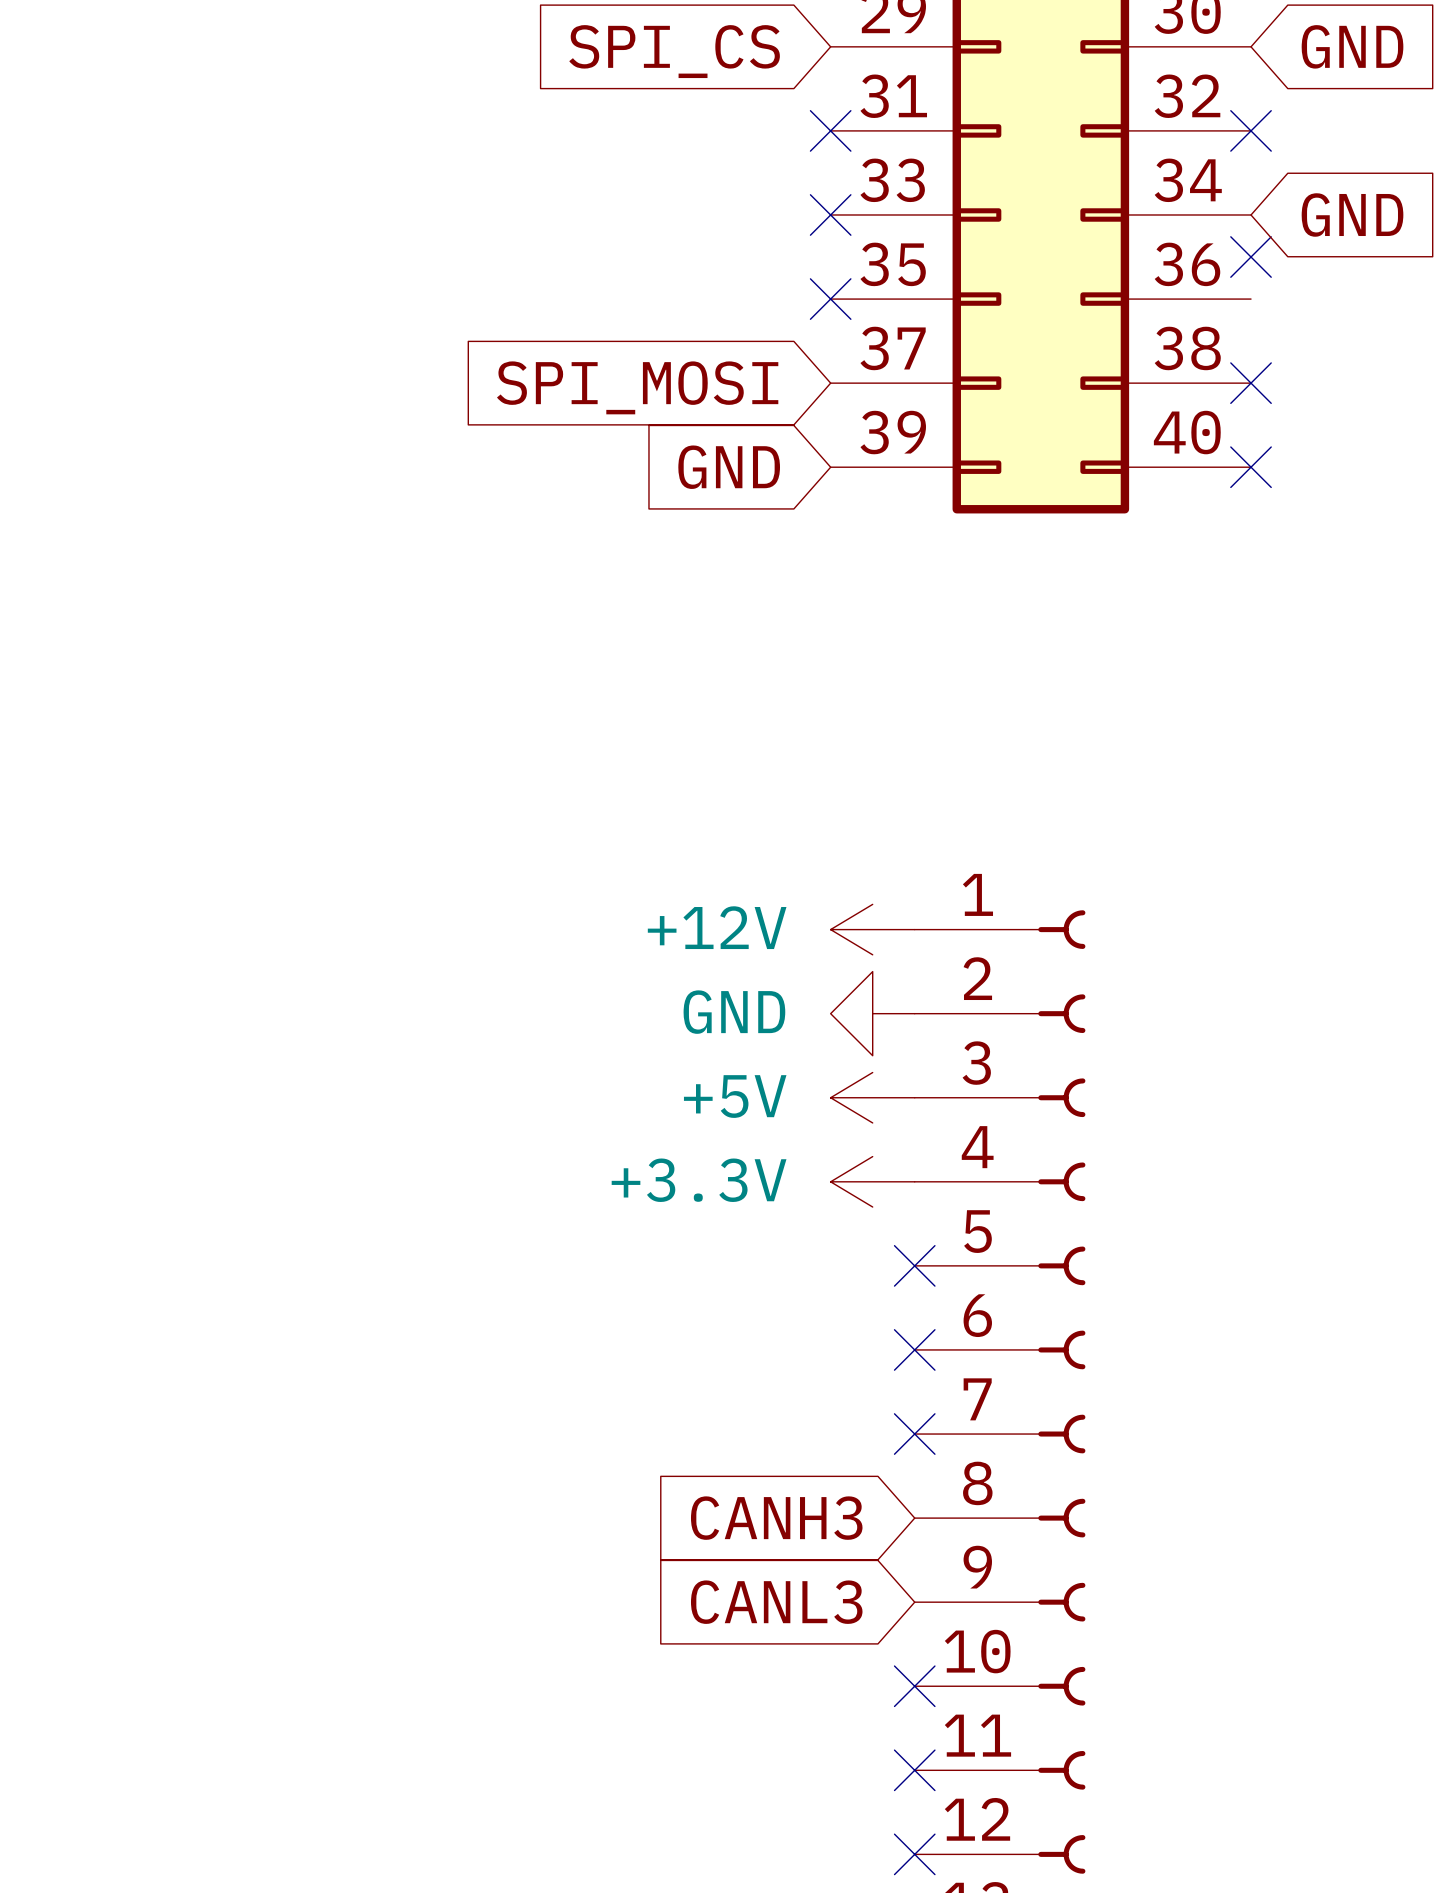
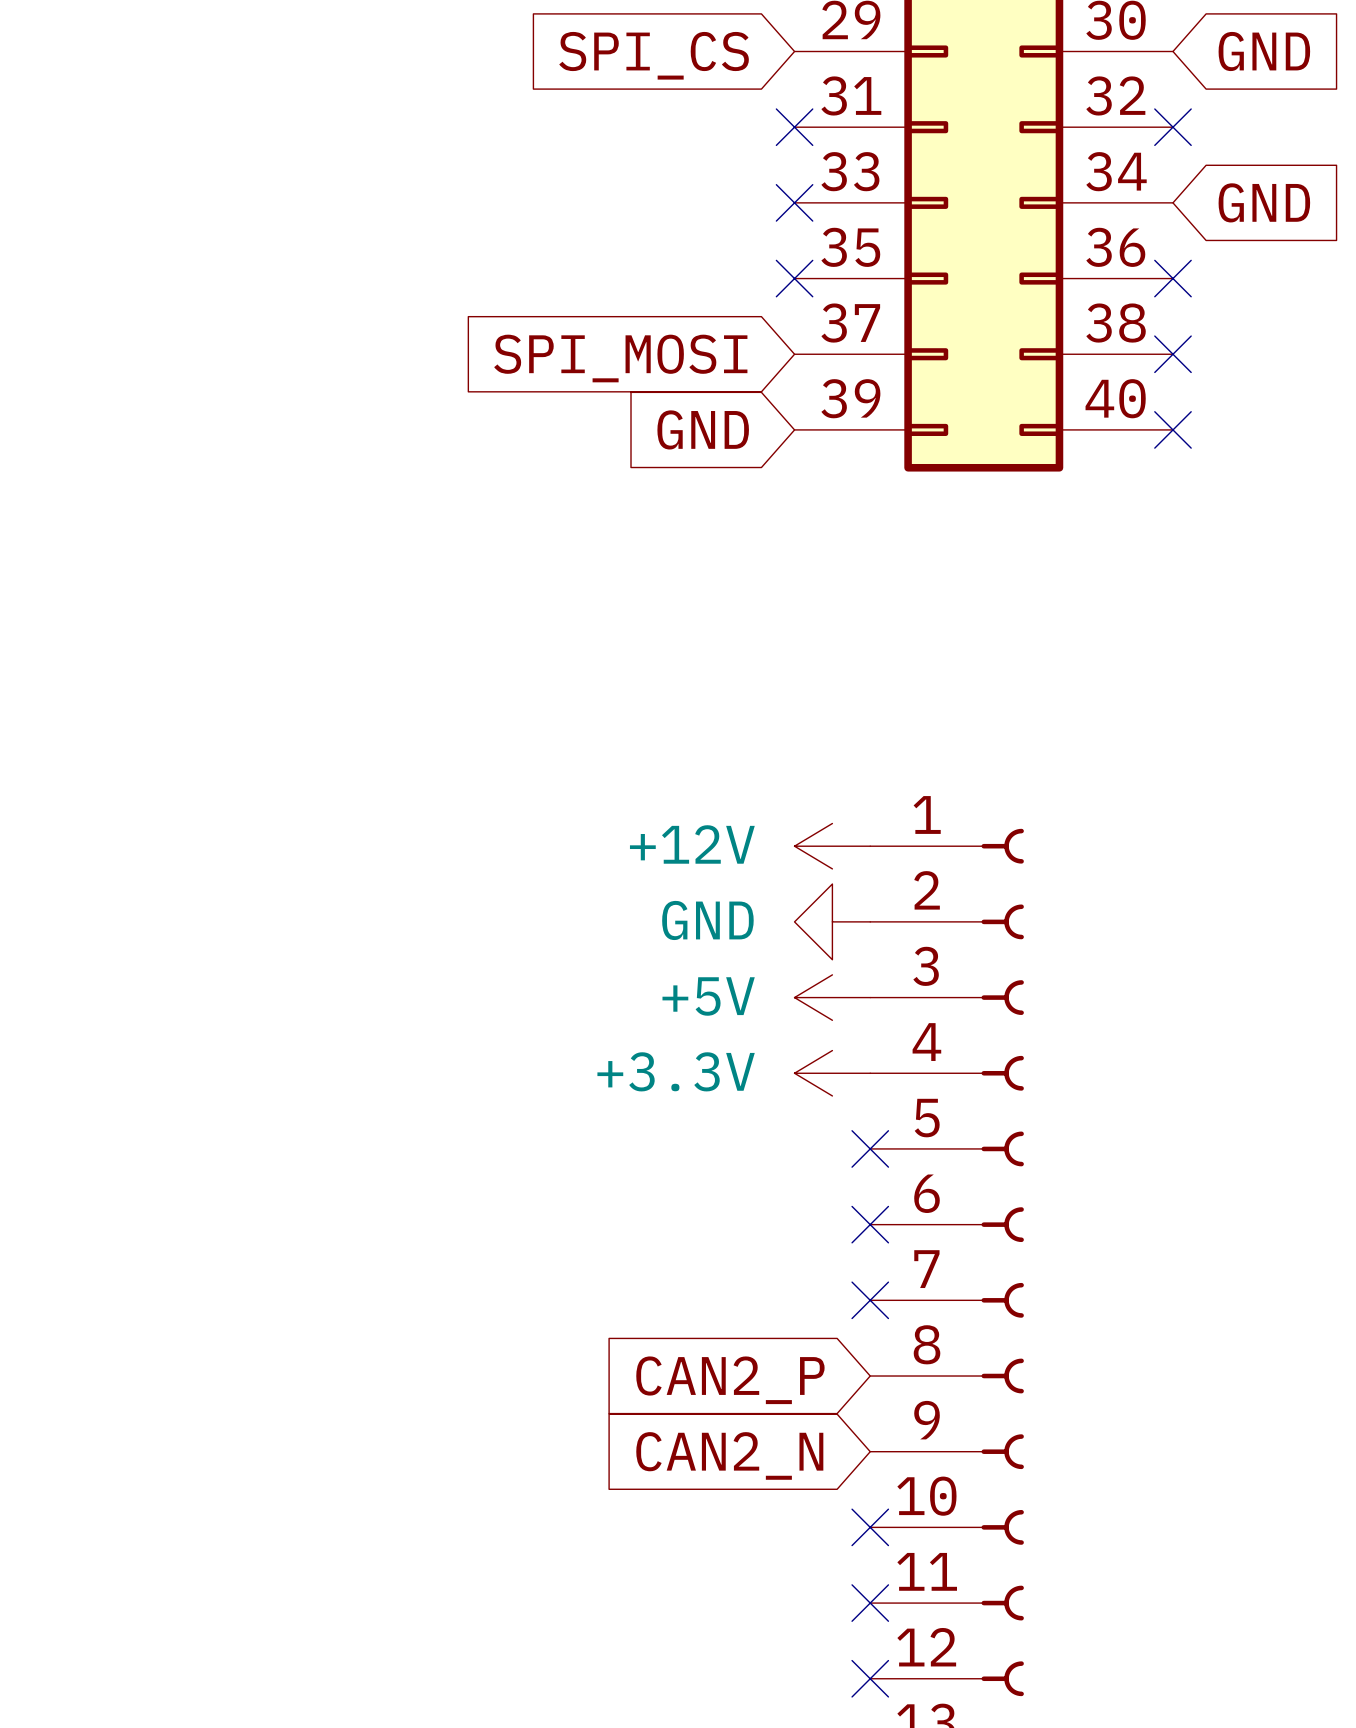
no-connect mark position: (1251, 257) -> (1172, 278)
global label: CANH3 (776, 1518) -> CAN2_P (730, 1380)
global label: CANL3 (776, 1602) -> CAN2_N (729, 1455)

